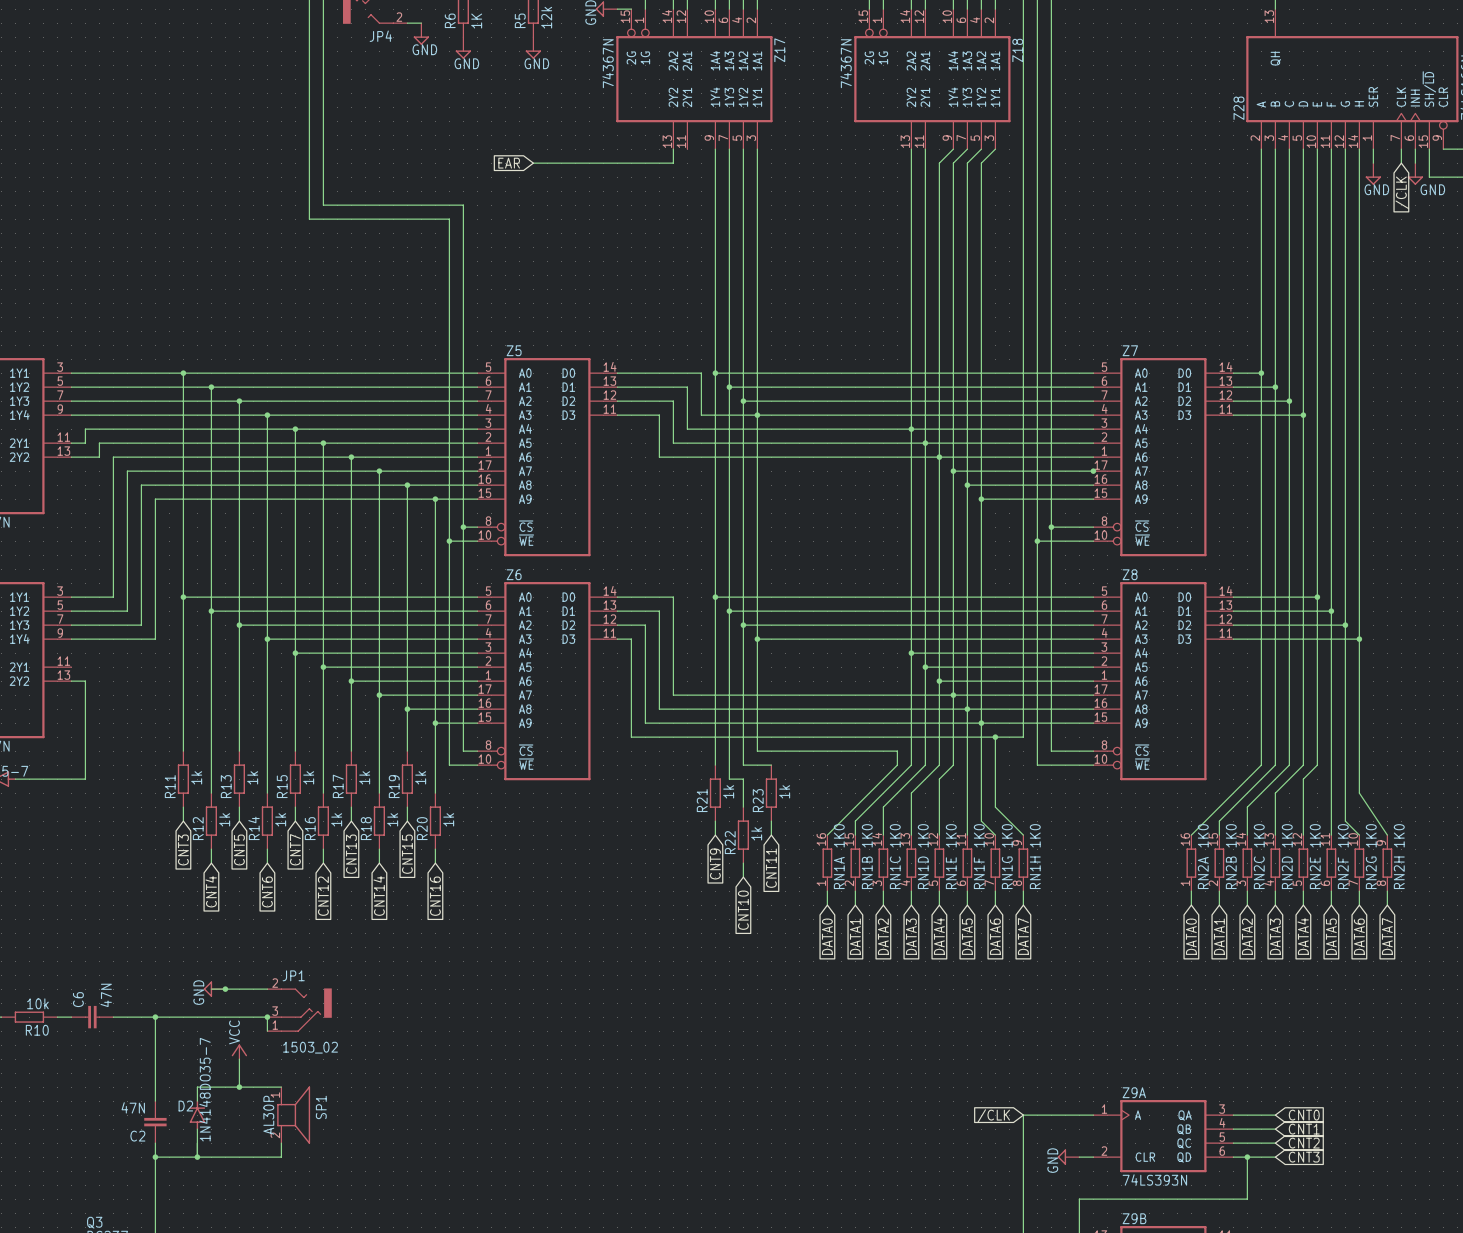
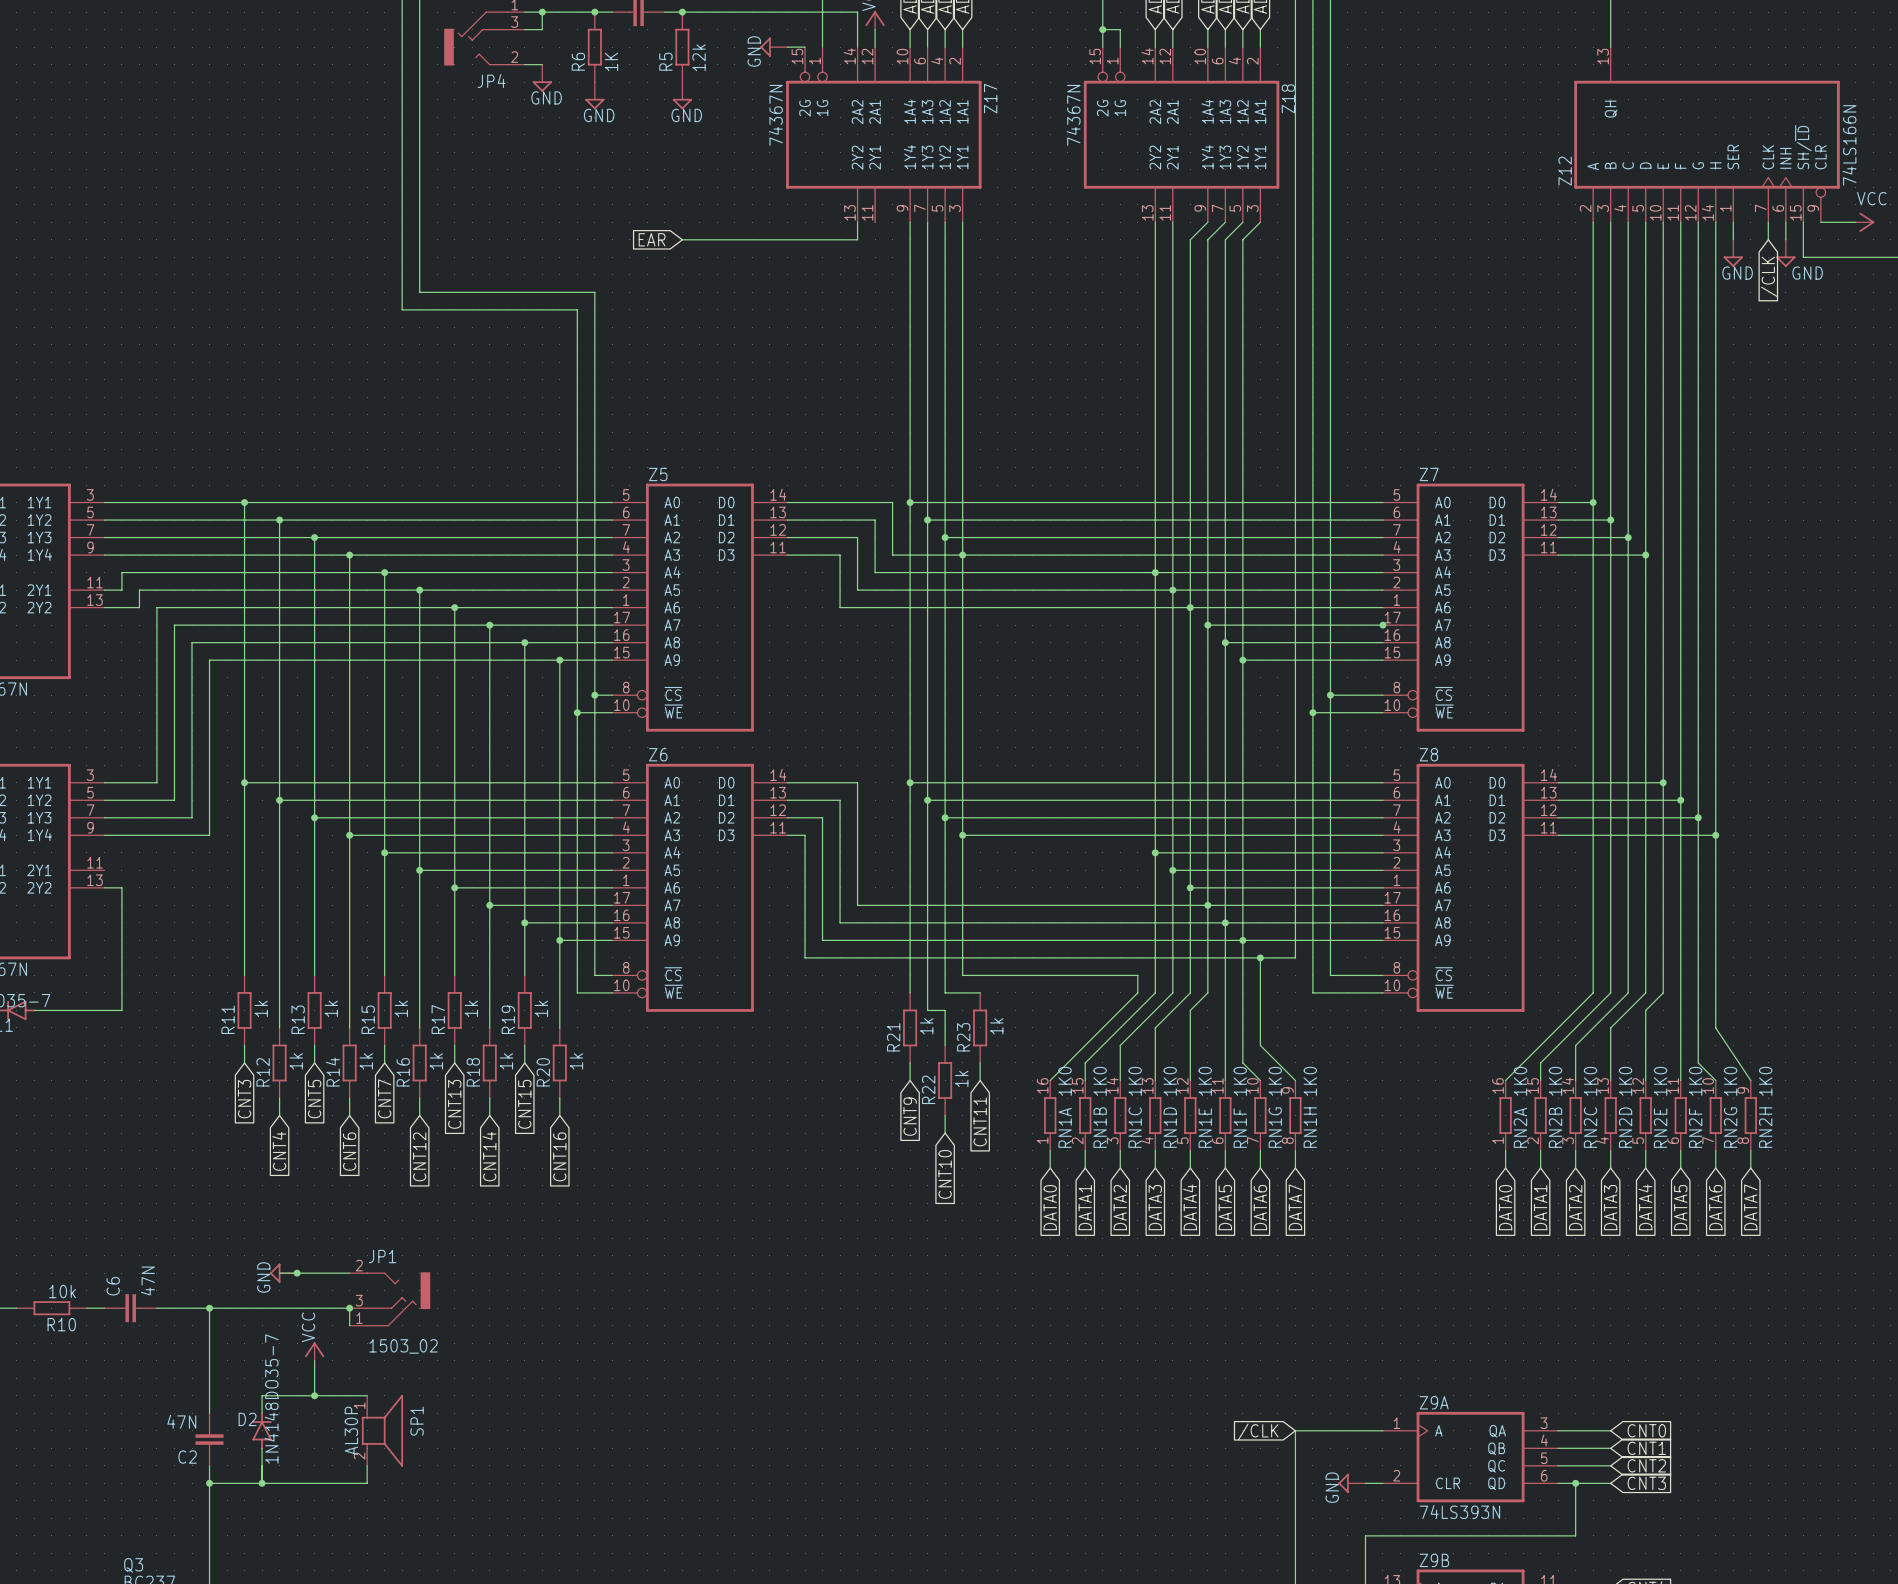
Z28 name: Z28 (1238, 108) -> Z12 (1565, 171)

